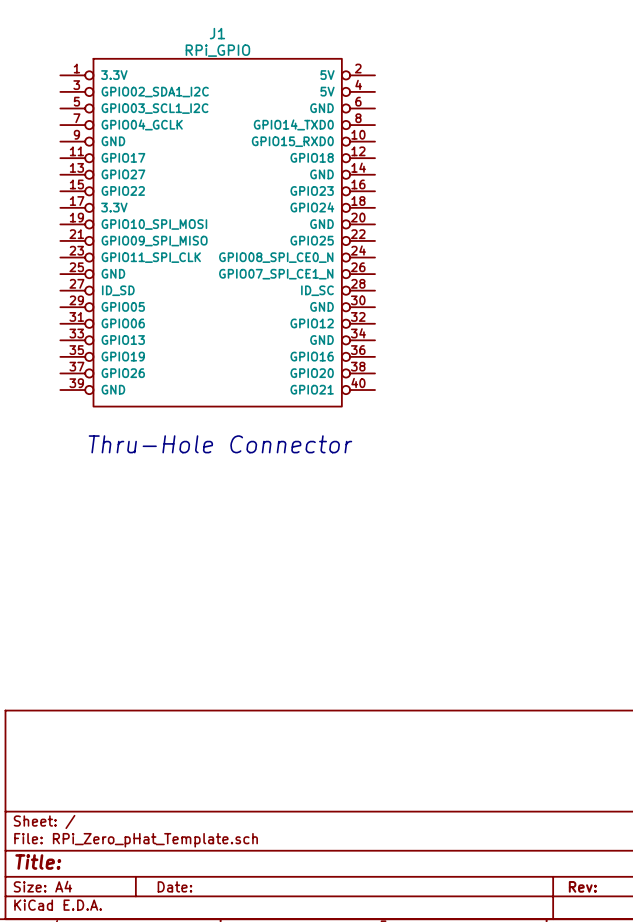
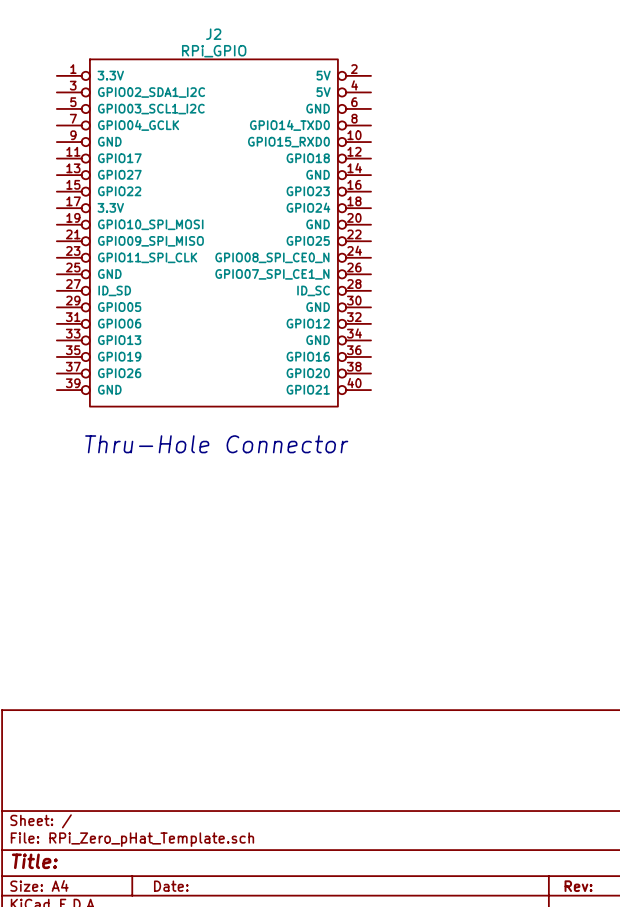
J1 name: J1 (217, 33) -> J2 (213, 34)

